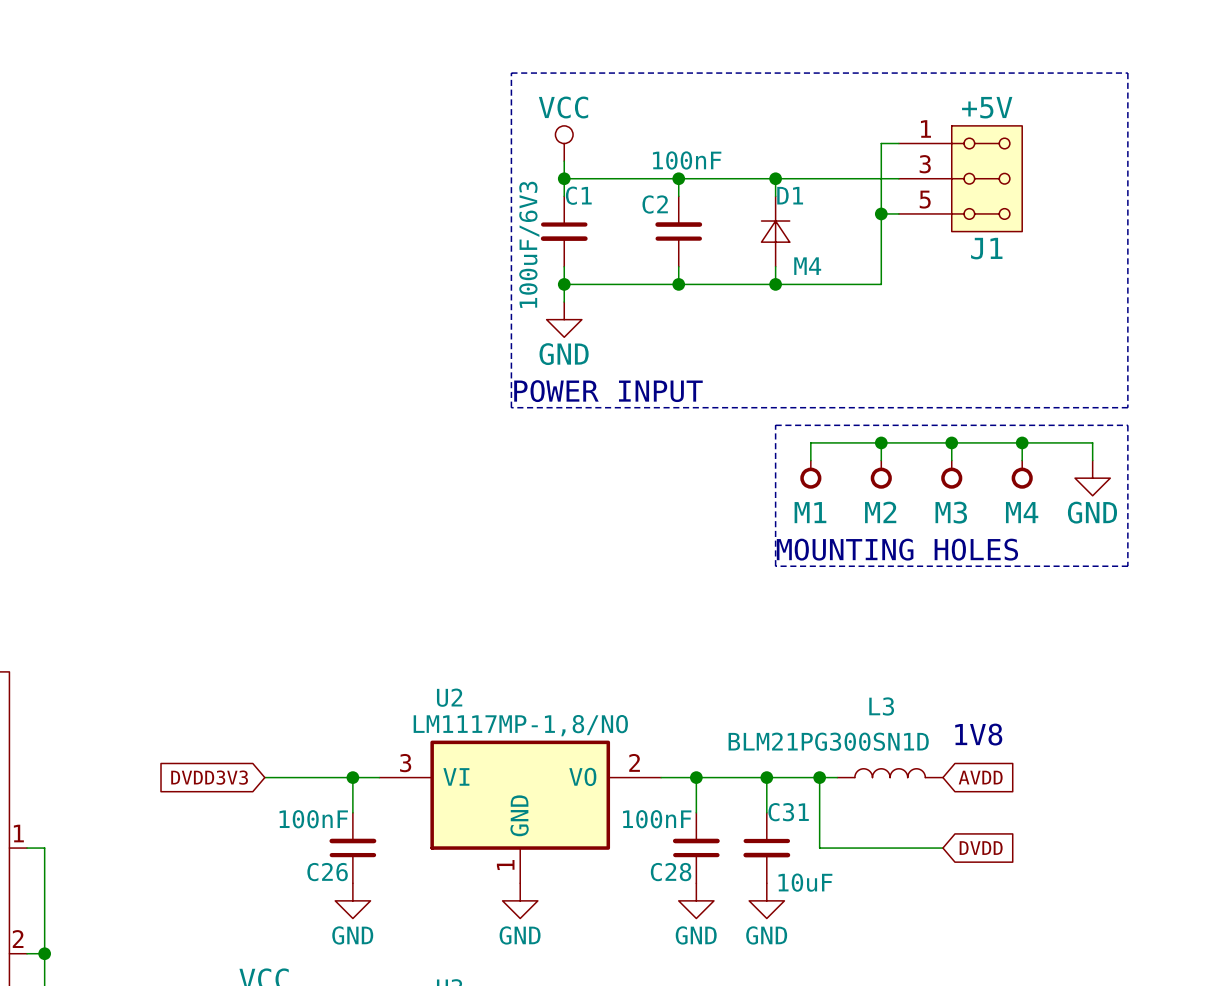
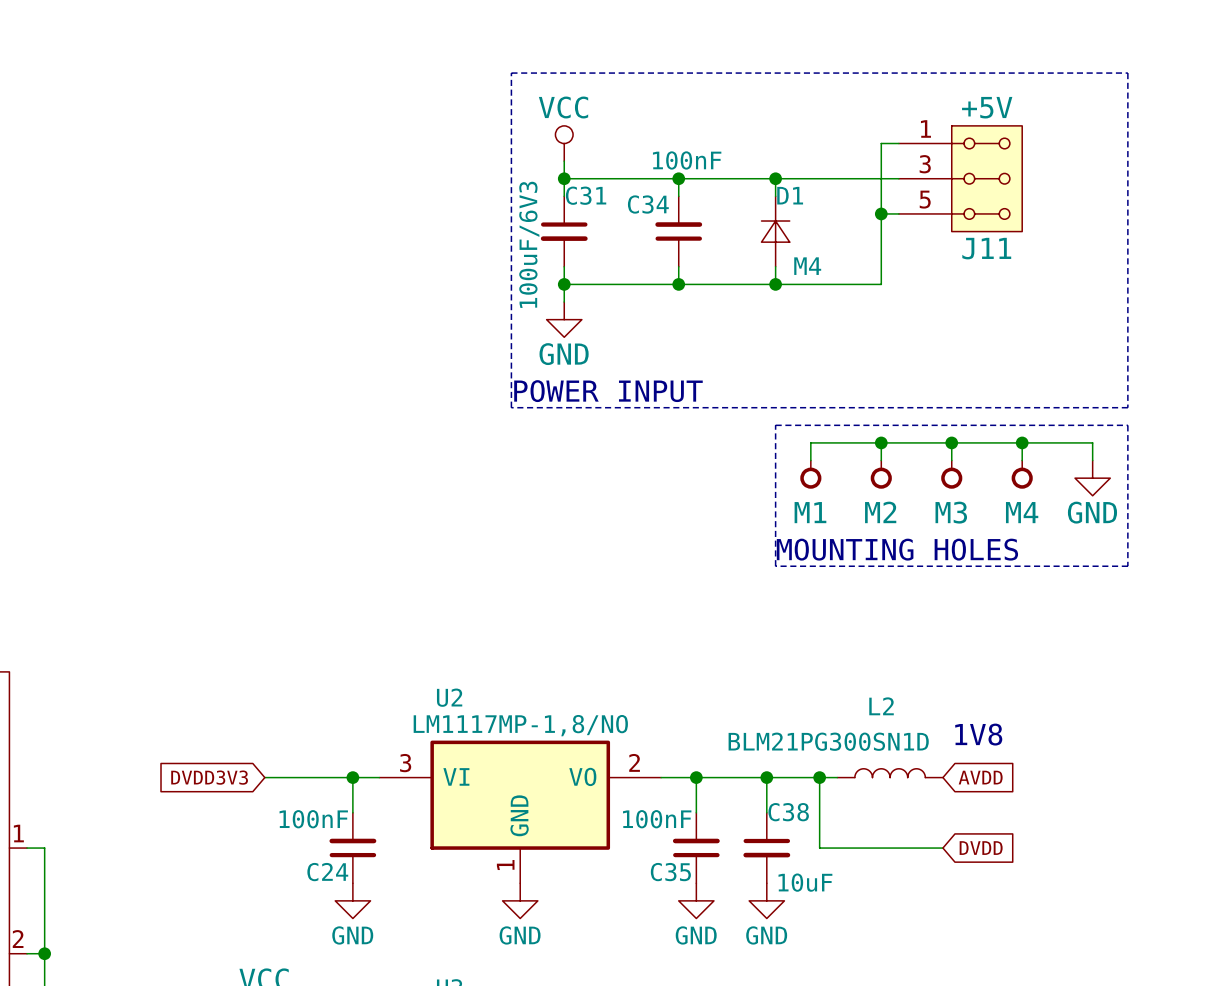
C1 name: C1 (578, 195) -> C31 (586, 195)
C2 name: C2 (655, 204) -> C34 (648, 204)
J1 name: J1 (986, 248) -> J11 (986, 248)
L3 name: L3 (881, 706) -> L2 (881, 706)
C31 name: C31 (788, 812) -> C38 (788, 812)
C26 name: C26 (327, 872) -> C24 (327, 872)
C28 name: C28 (671, 872) -> C35 (670, 872)

